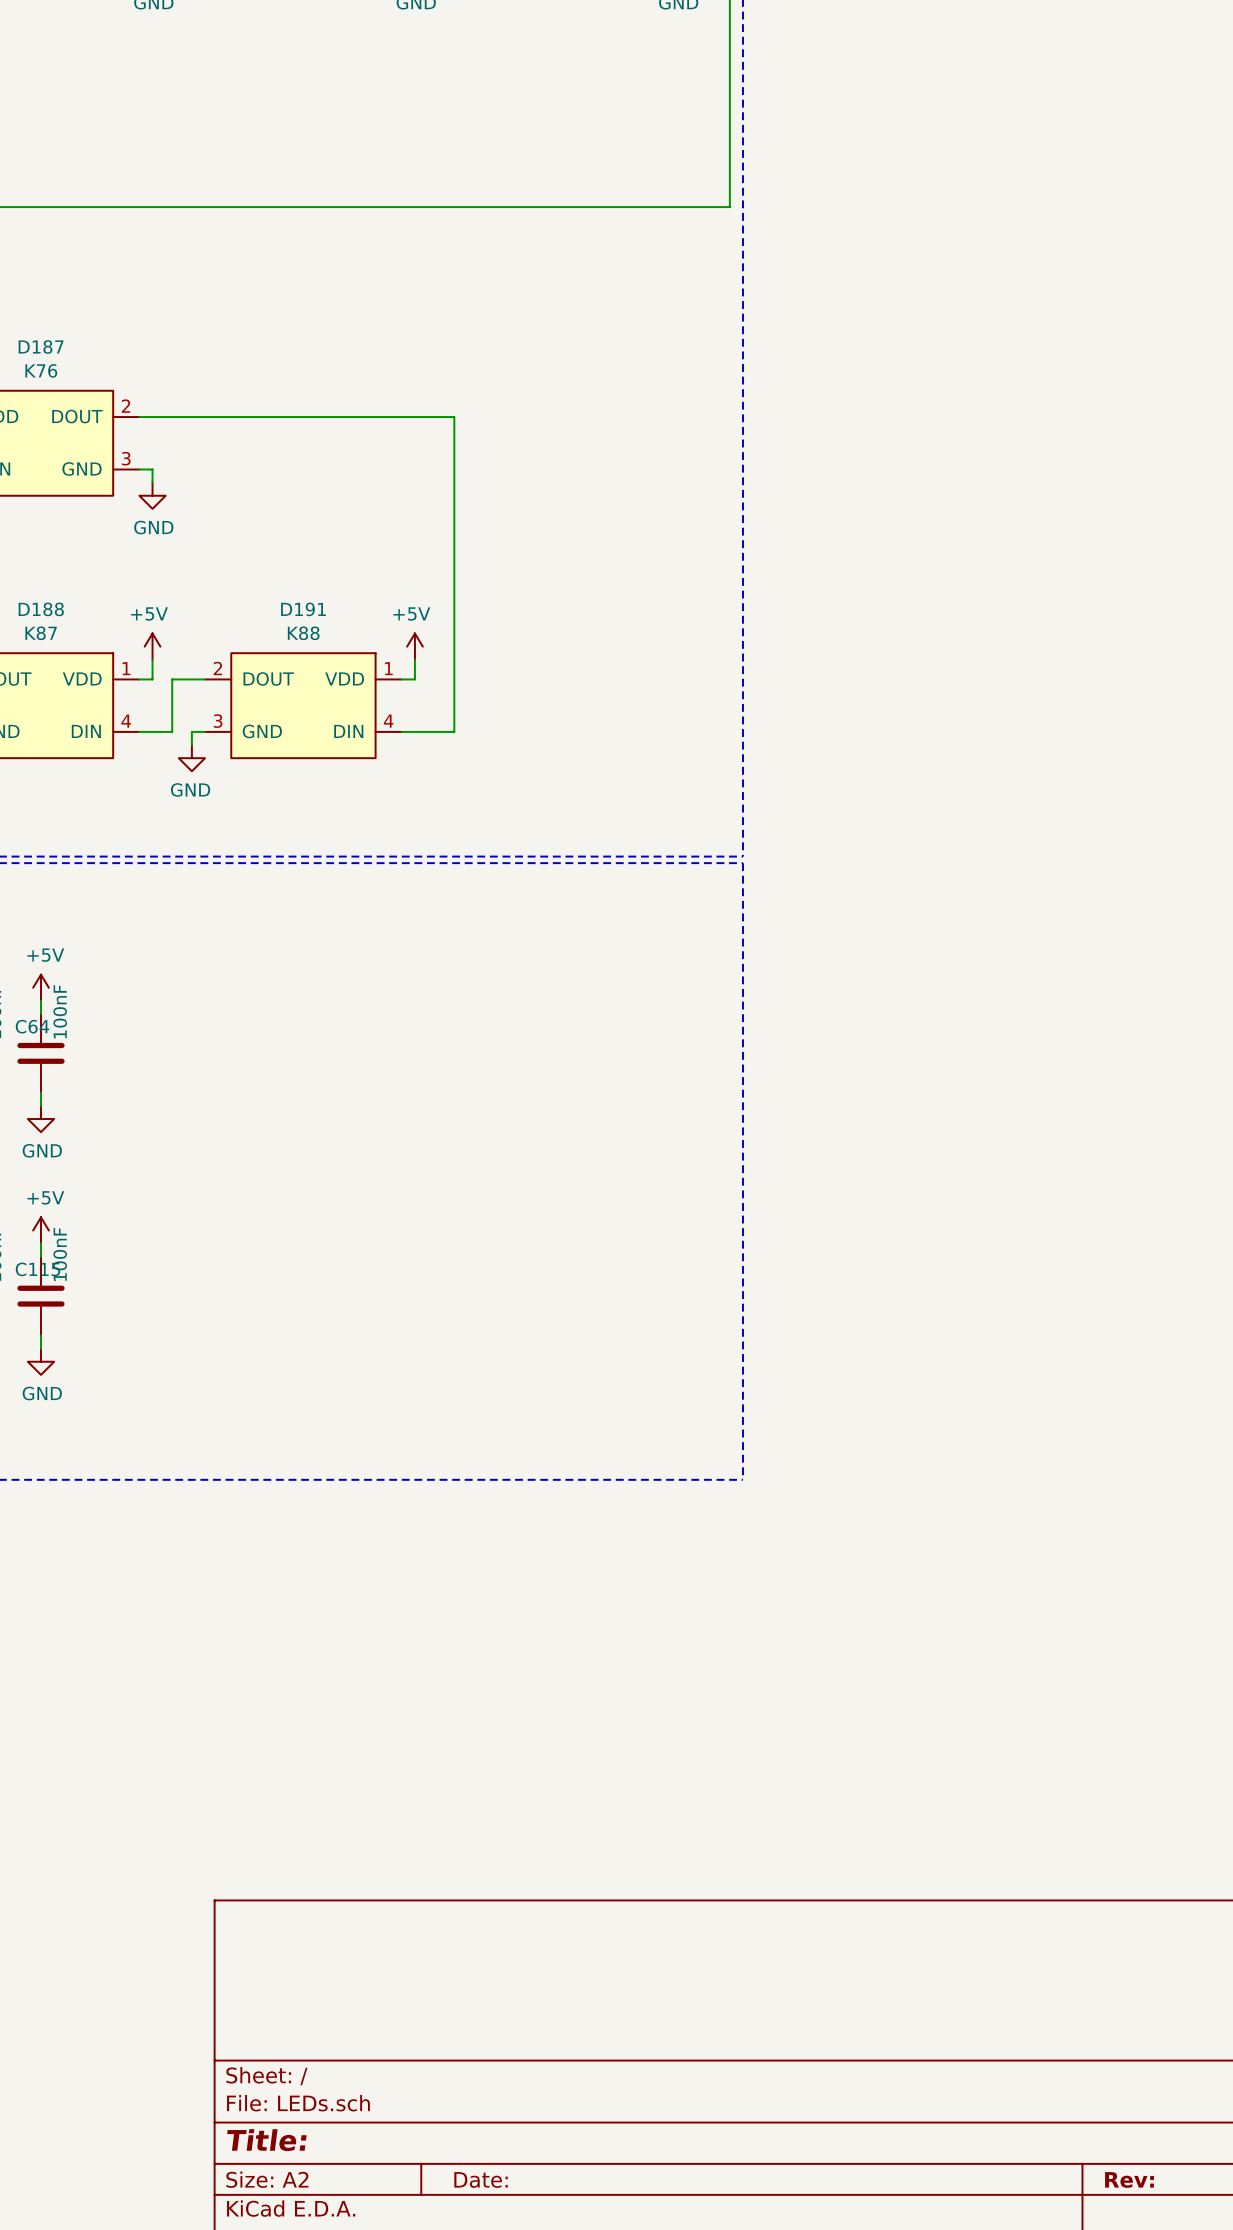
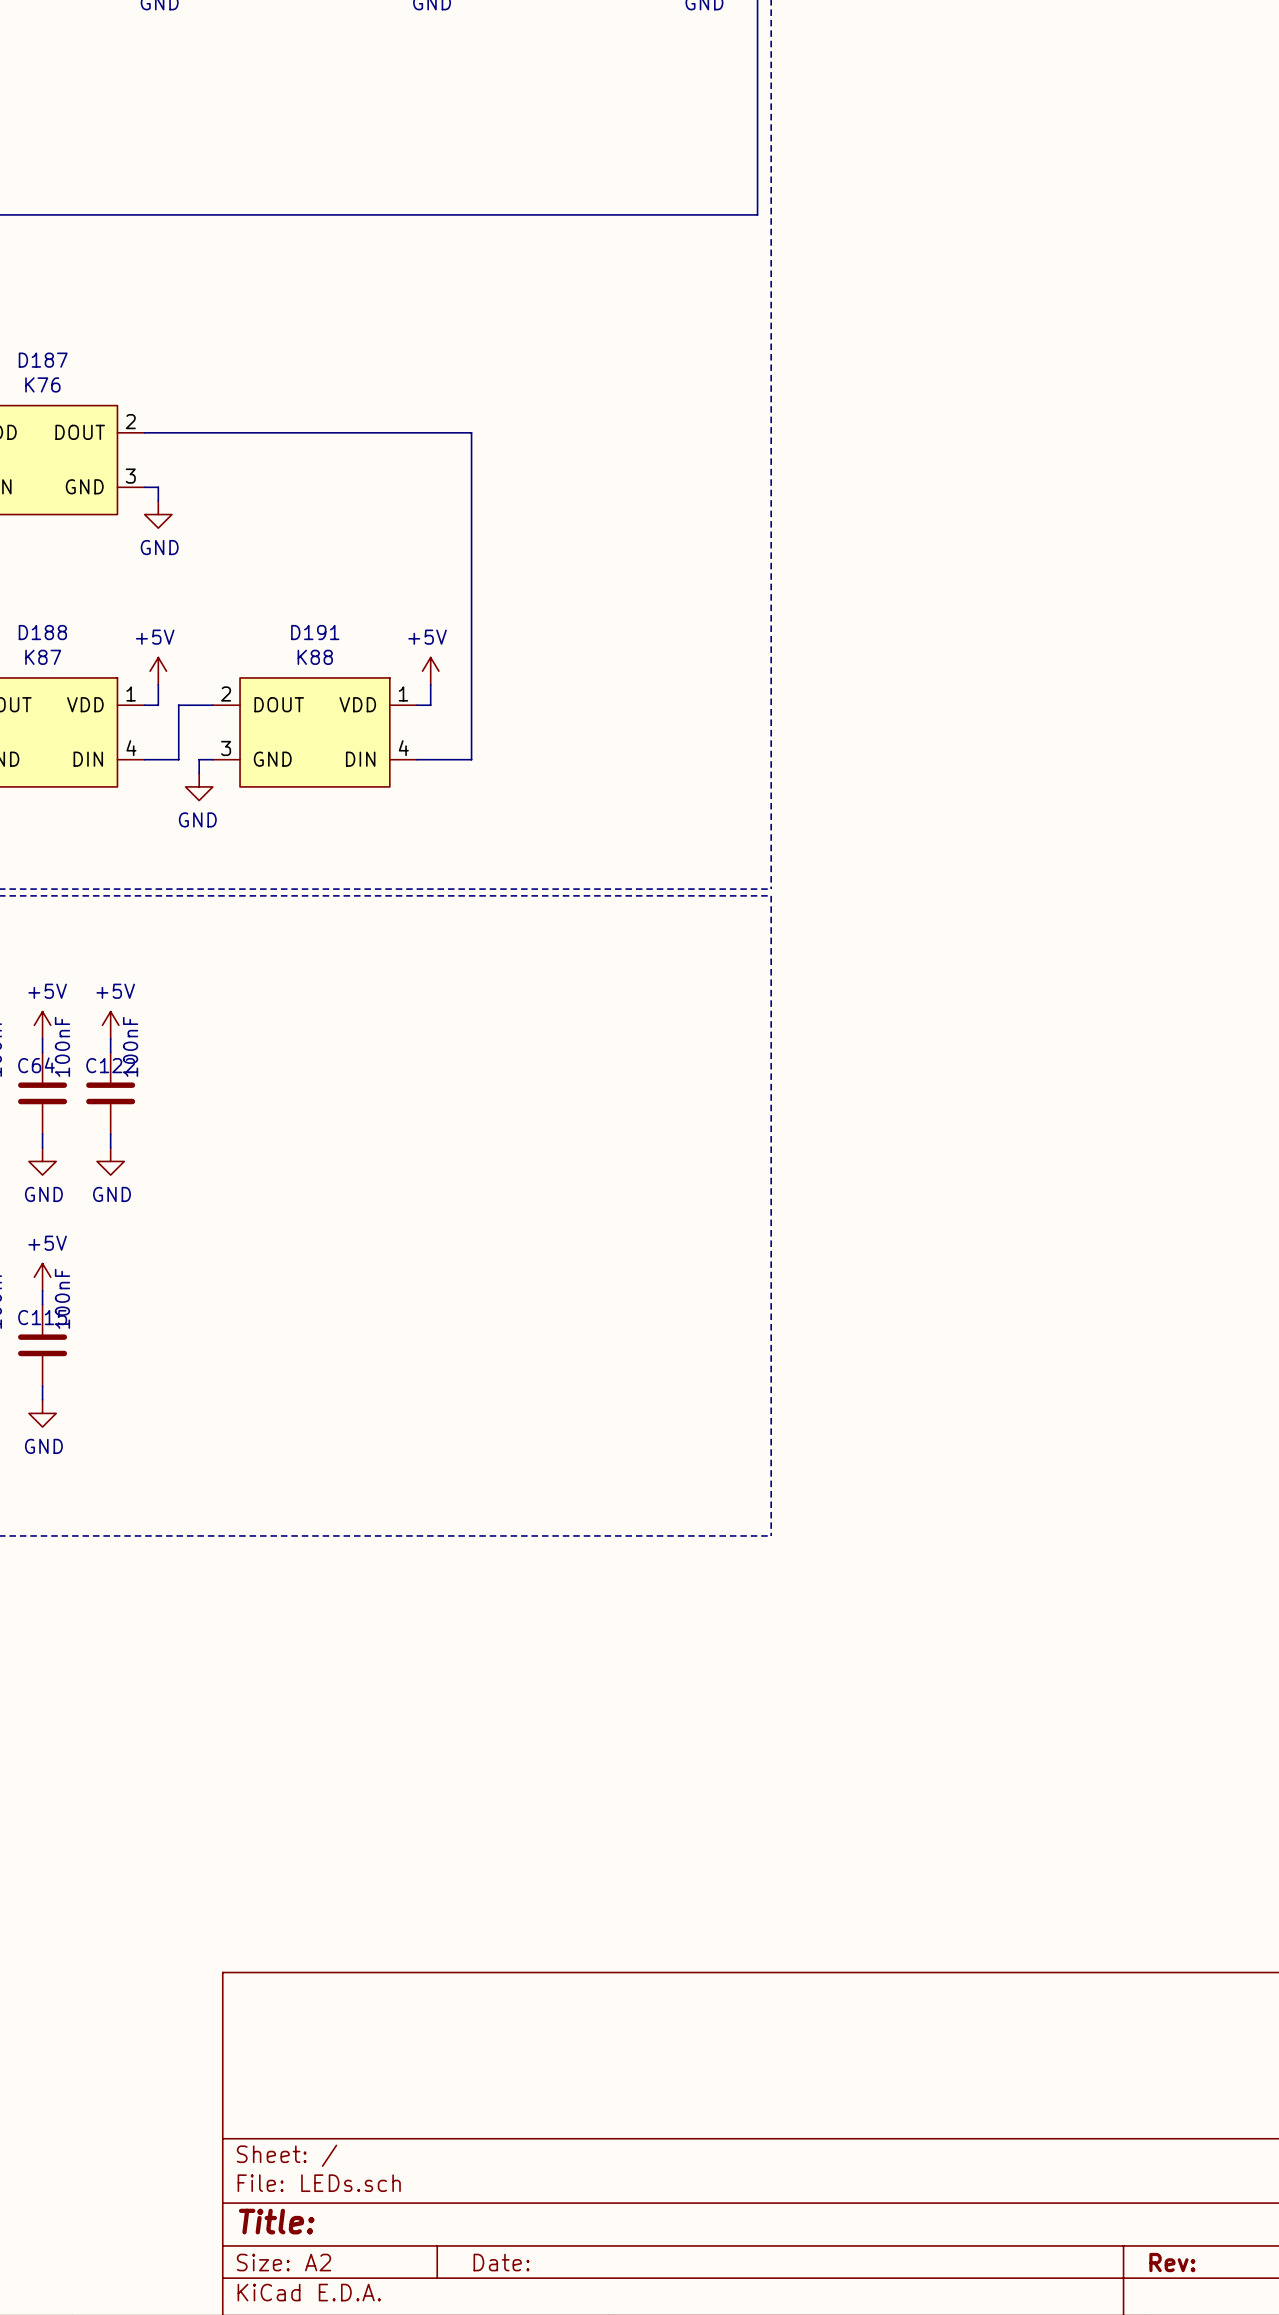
power symbol: none -> +5V (110, 1025)
wire: none -> (110, 1038) (110, 1052)
C122: none -> 100nF (110, 1093)
wire: none -> (110, 1134) (110, 1147)
power symbol: none -> GND (110, 1161)

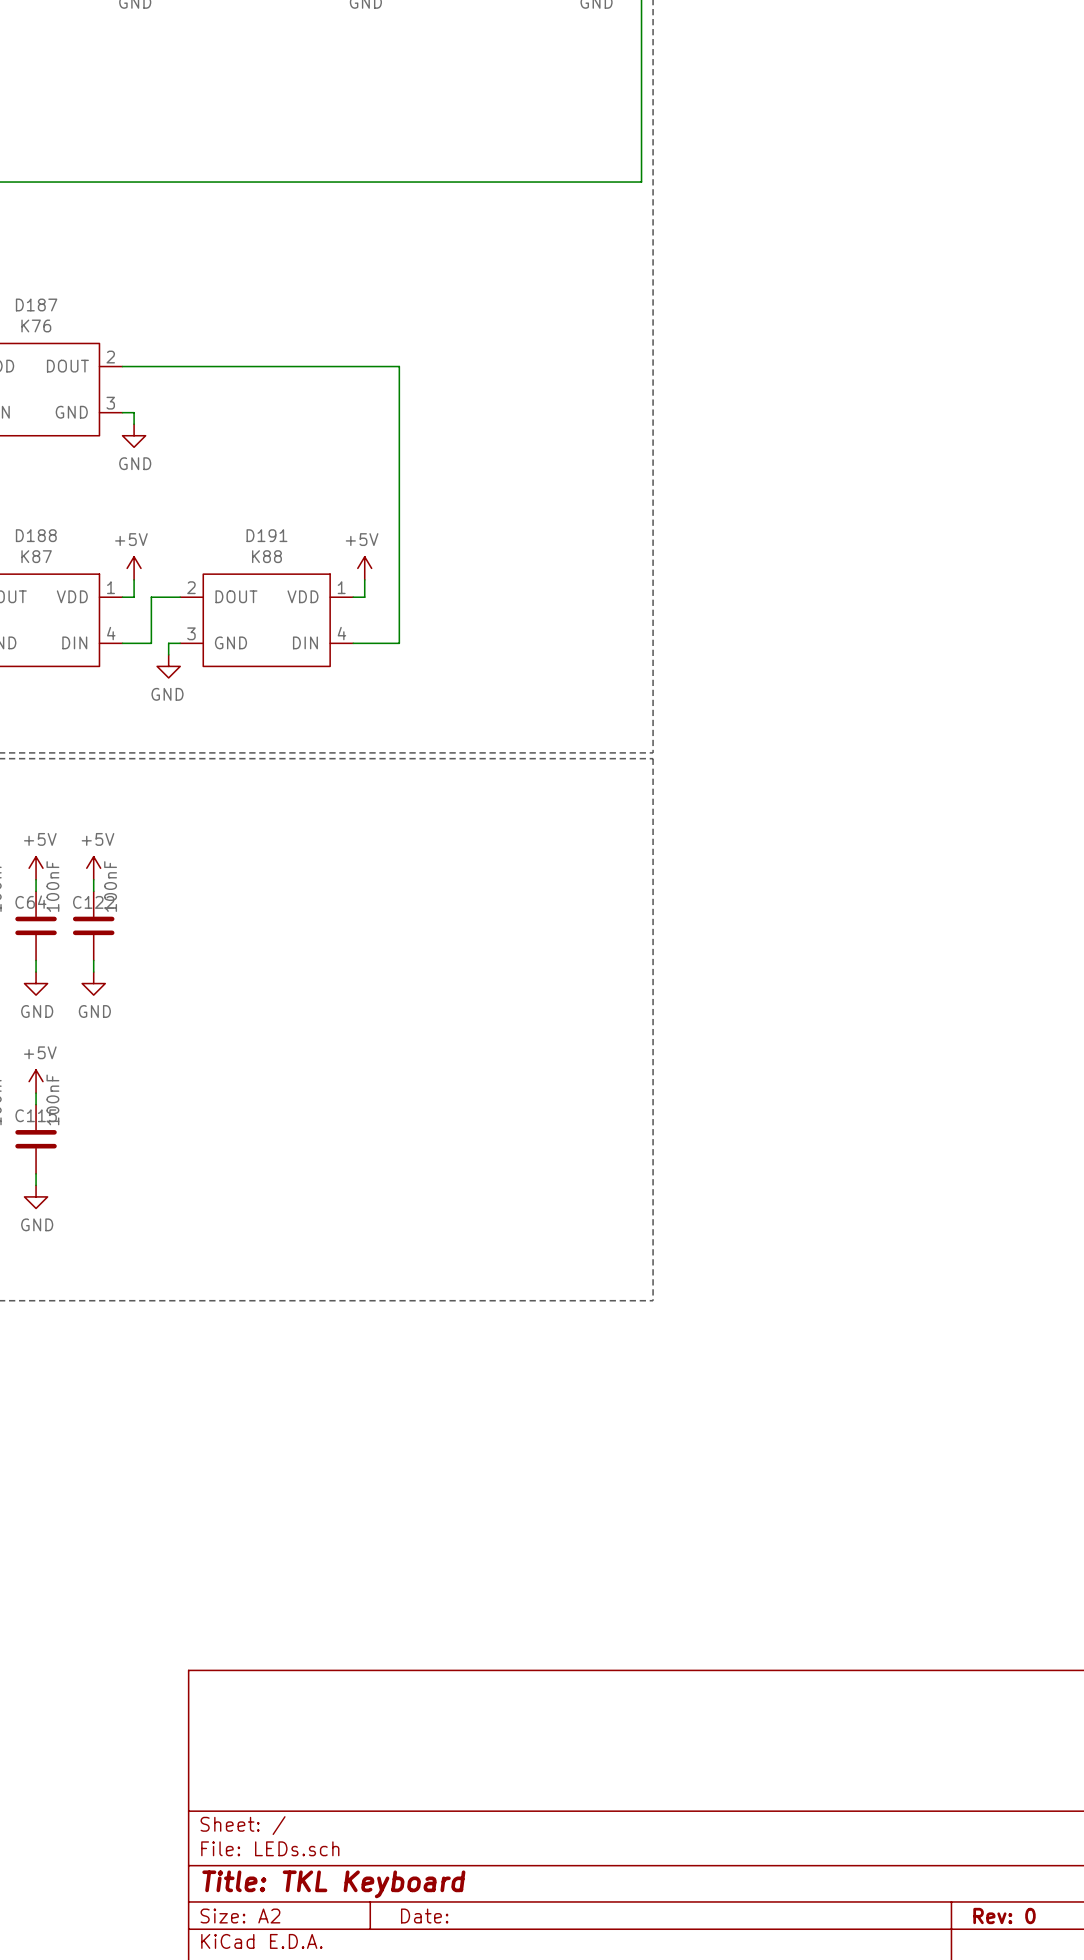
title block: Title: (276, 2221) -> Title: TKL Keyboard (333, 1884)
title block: Rev: (1172, 2262) -> Rev: 0 (1004, 1916)

